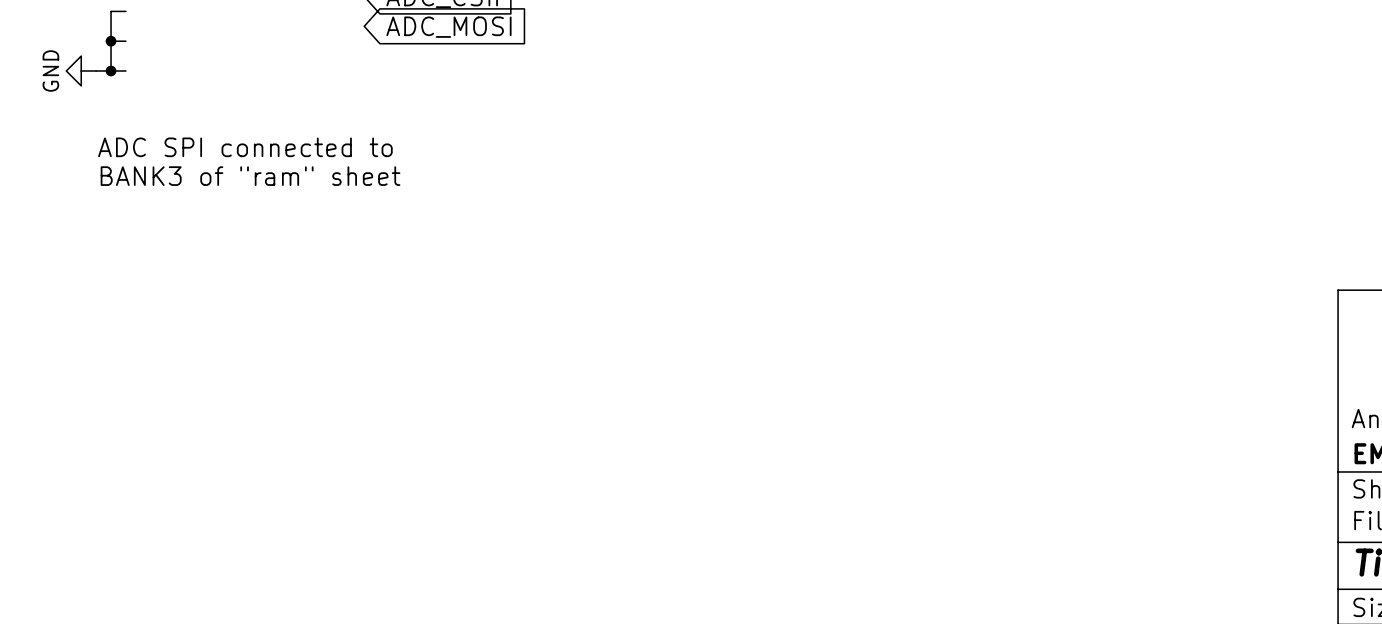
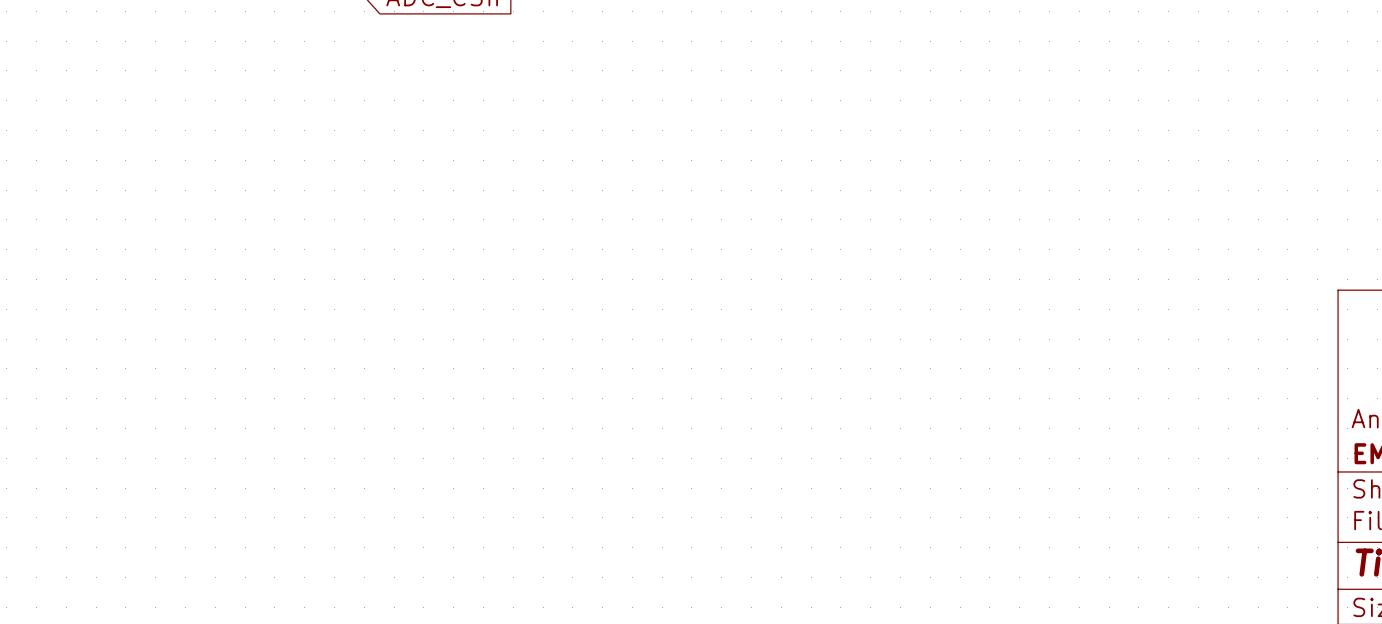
wire: (125, 11) (111, 11) (111, 70) -> none
global label: ADC_MOSI (448, 27) -> none
wire: (111, 41) (125, 41) -> none
junction: (111, 41) -> none
power symbol: GND (81, 70) -> none
wire: (96, 70) (125, 70) -> none
junction: (111, 70) -> none
text: ADC SPI connected to (245, 147) -> none
text: BANK3 of "ram" sheet (250, 176) -> none

